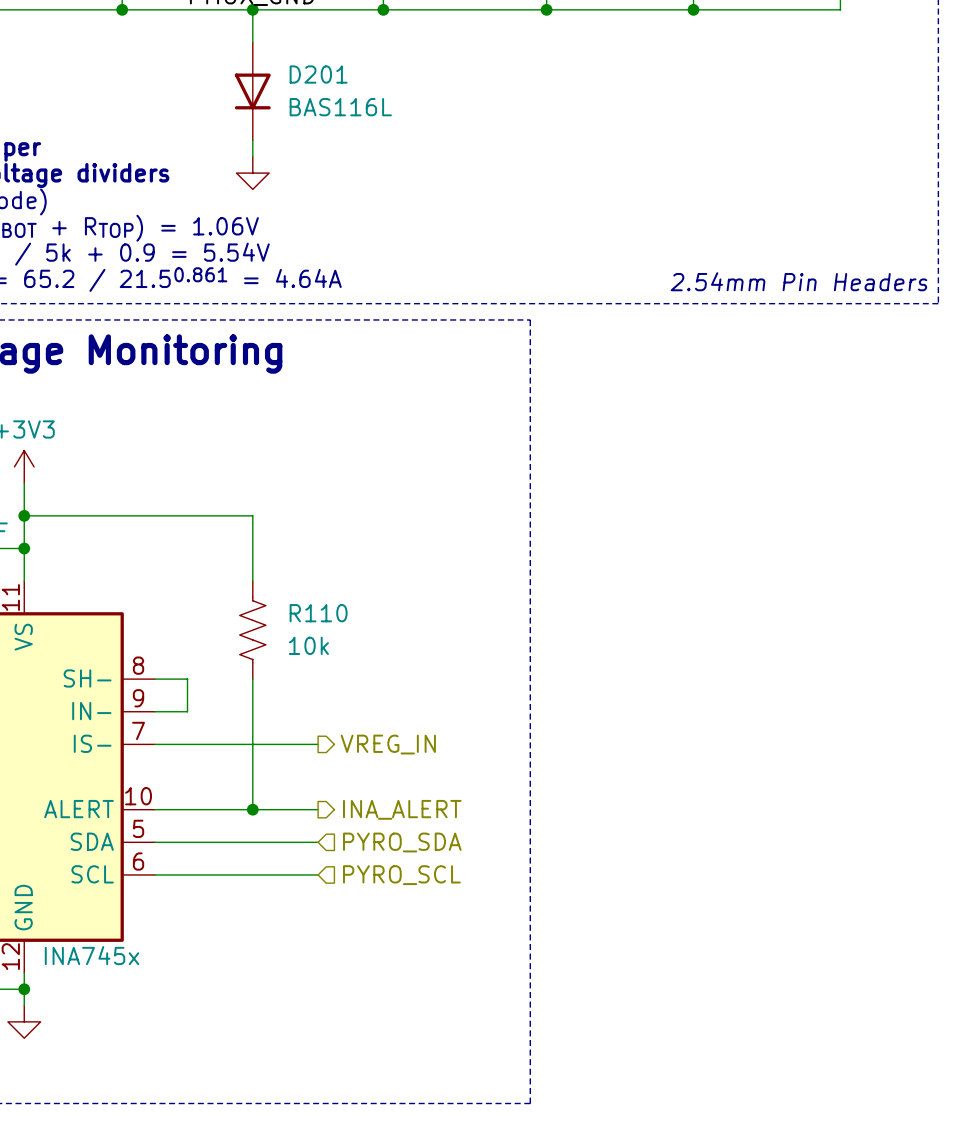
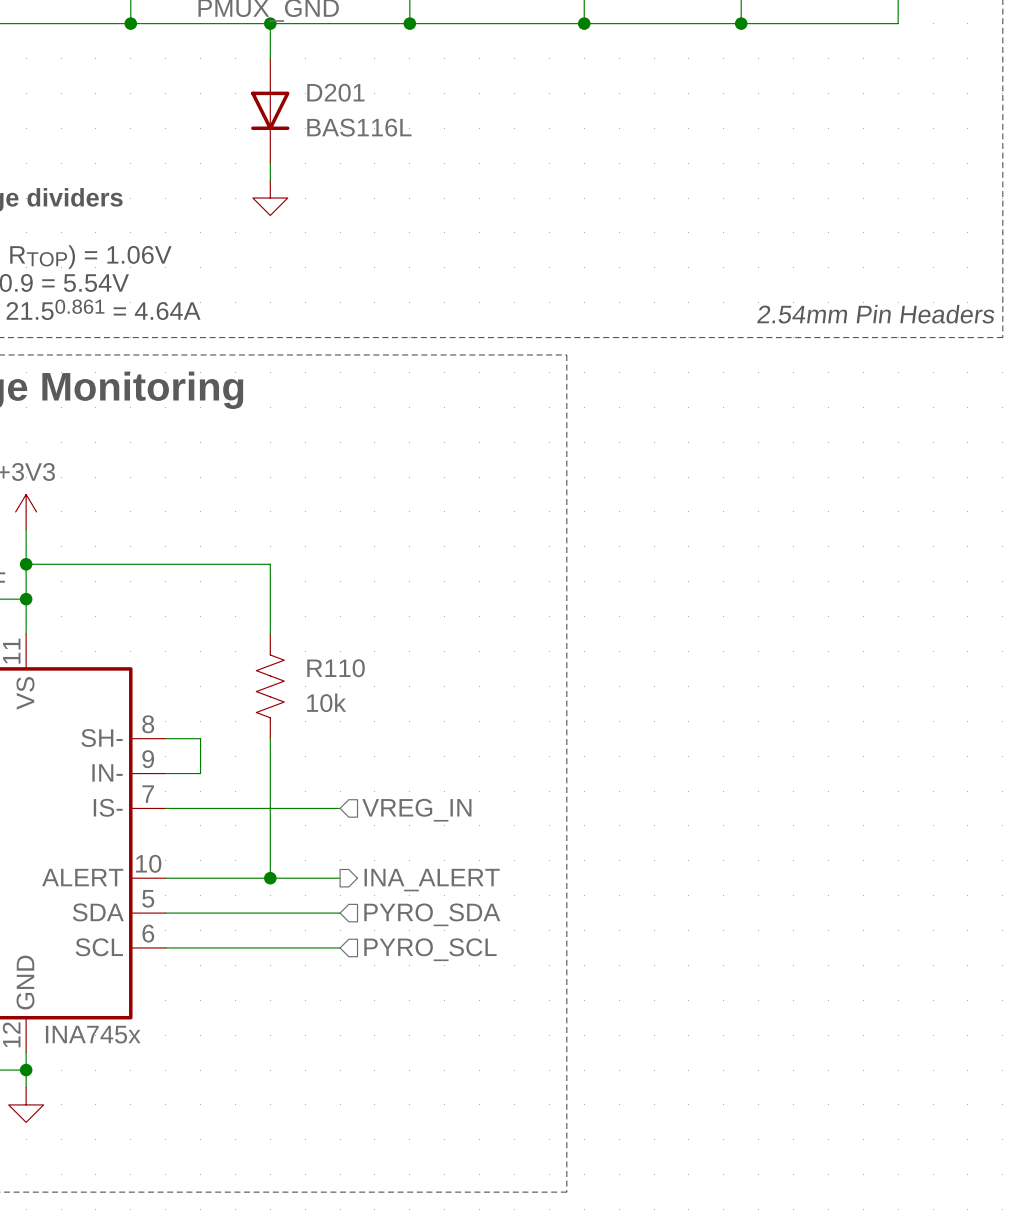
hierarchical label shape: output (388, 744) -> input (416, 810)

